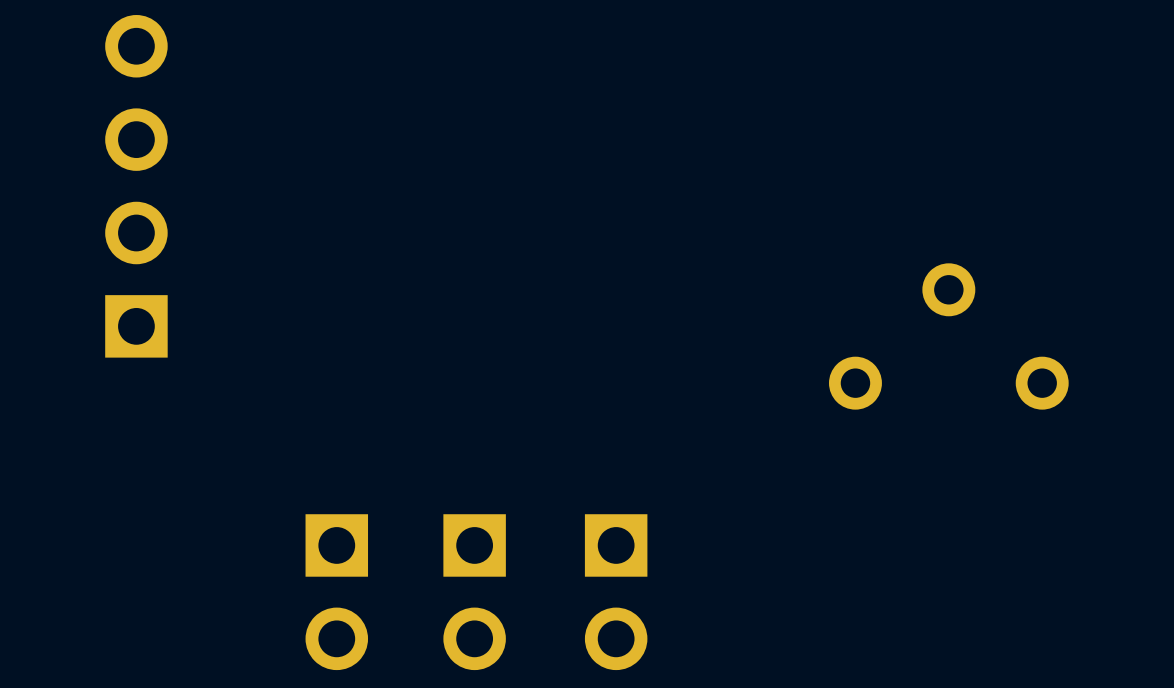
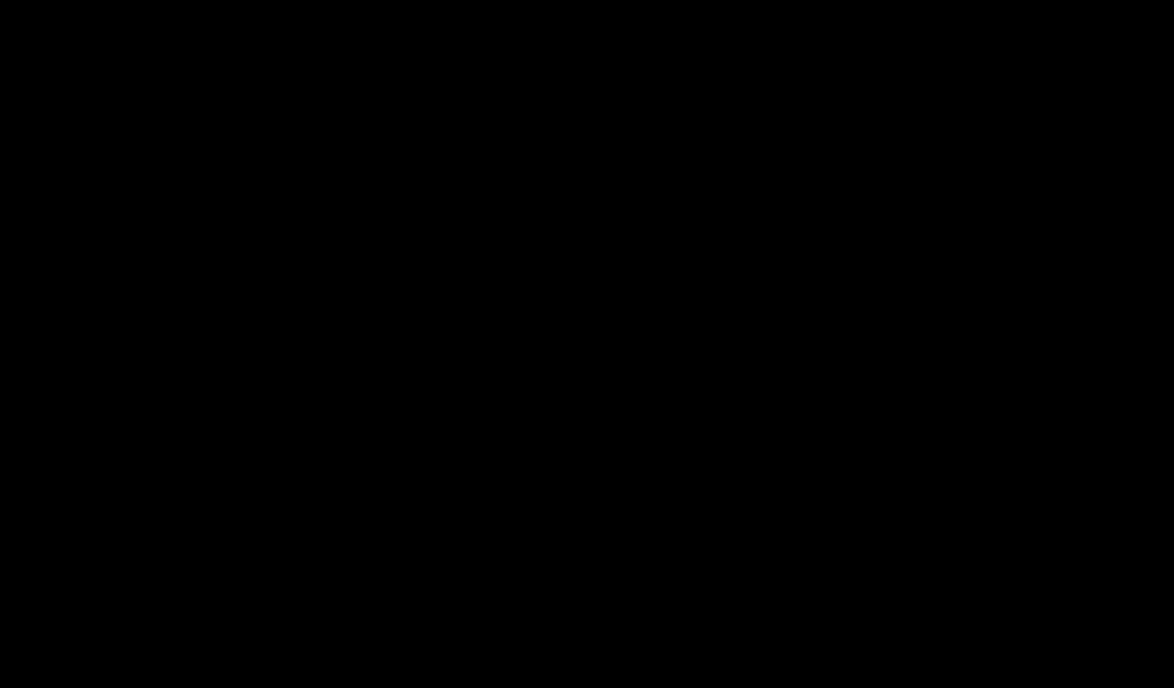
part: (136, 186) -> none
part: (948, 336) -> none
part: (336, 592) -> none
part: (474, 592) -> none
part: (616, 592) -> none

